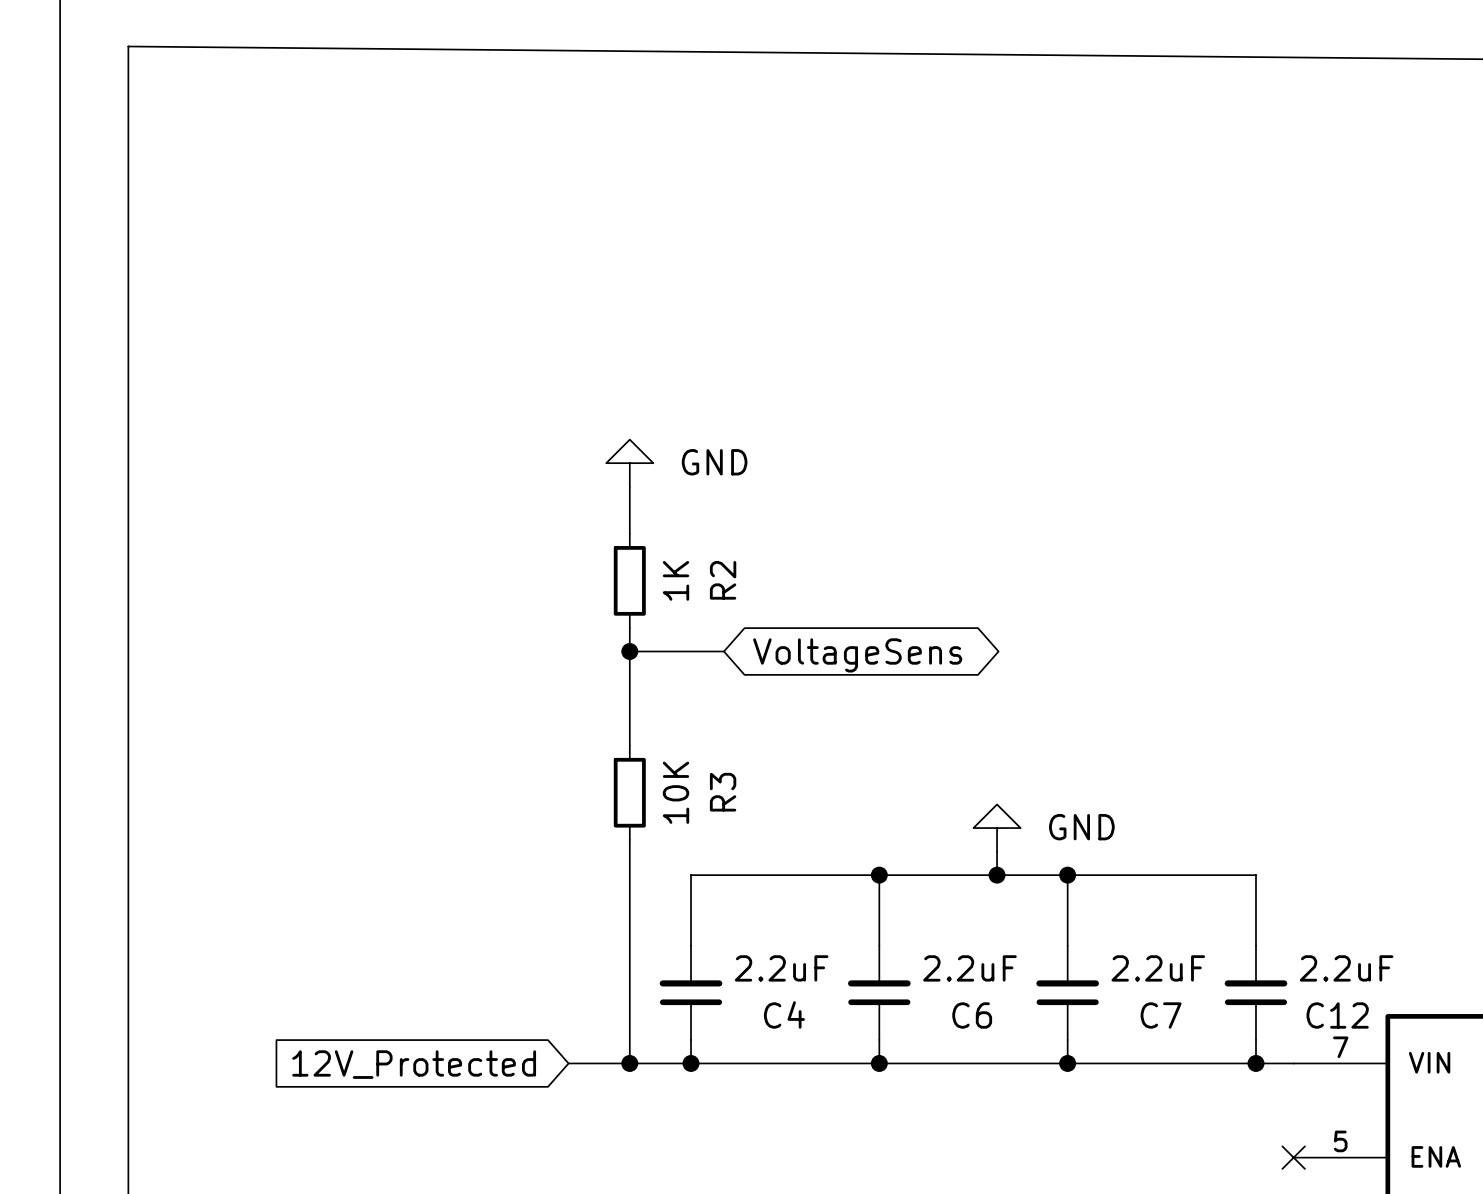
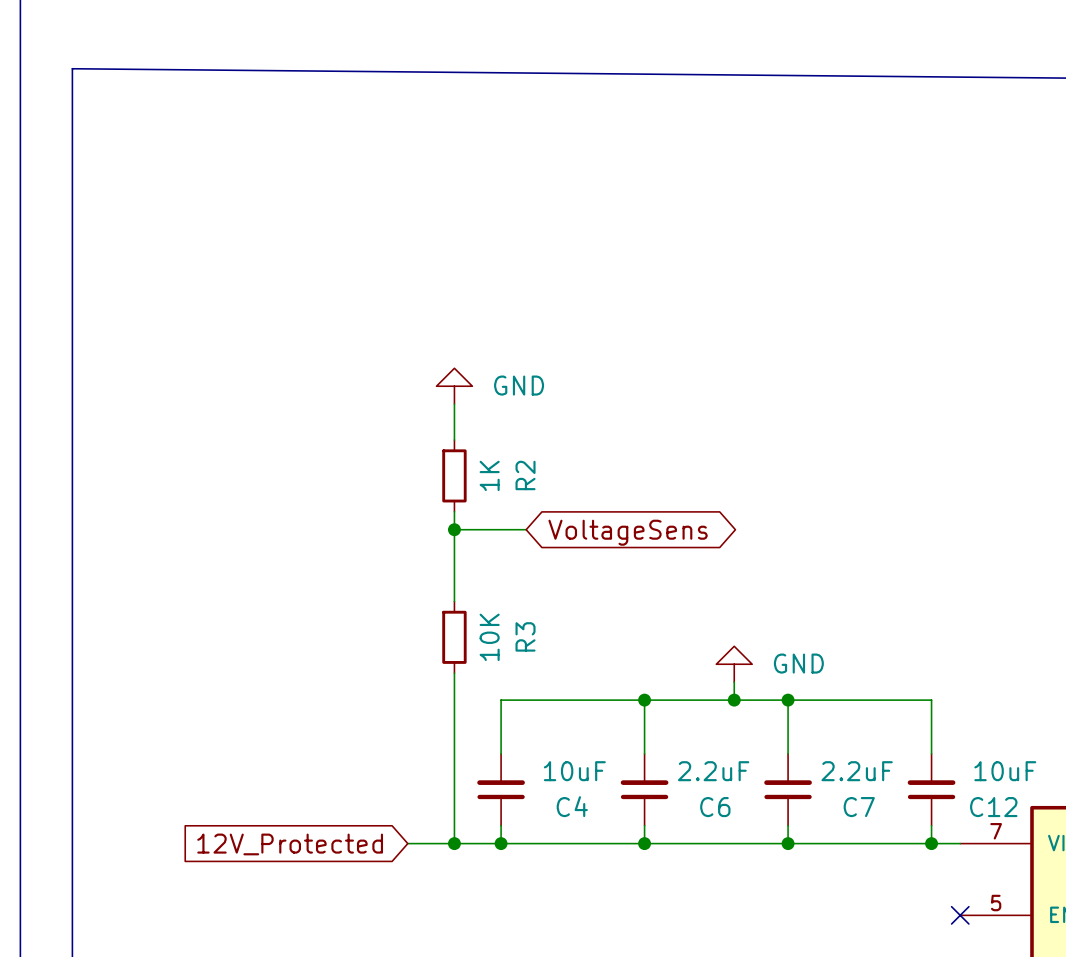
C4 value: 2.2uF (781, 968) -> 10uF (574, 771)
C12 value: 2.2uF (1346, 968) -> 10uF (1005, 771)

